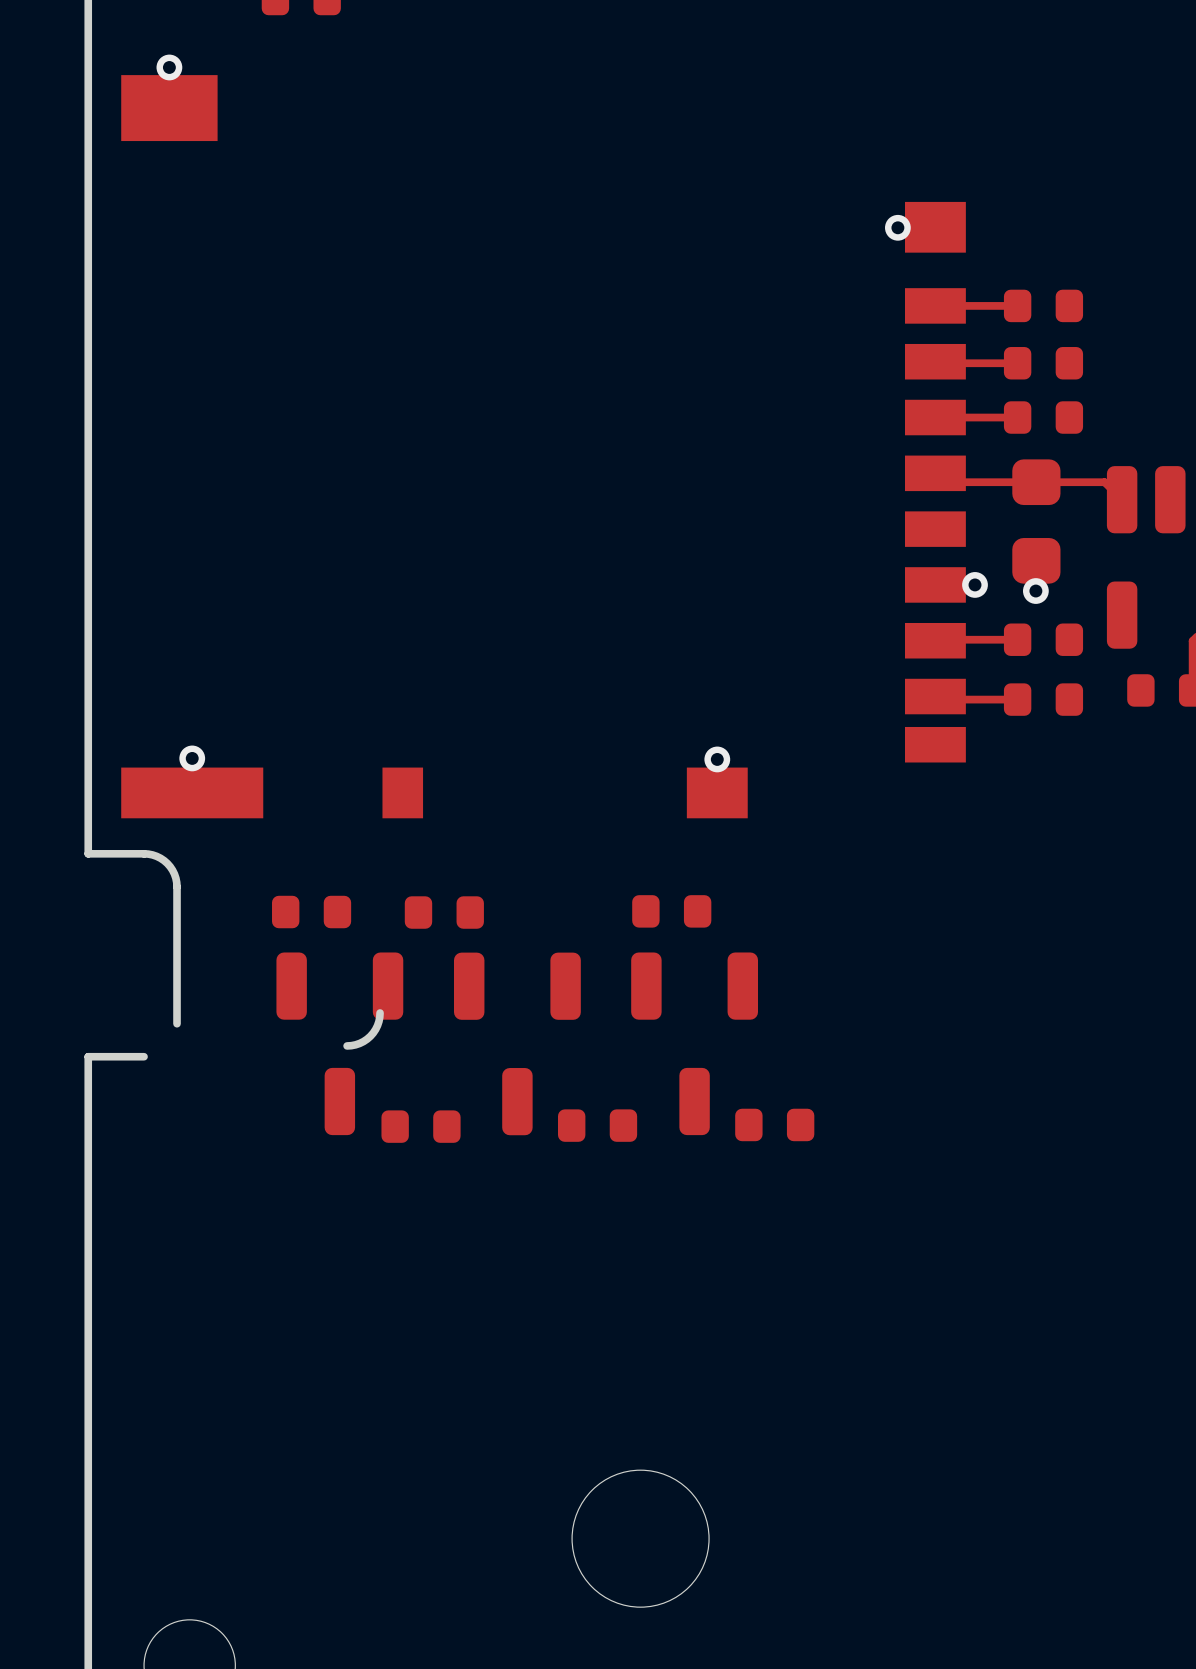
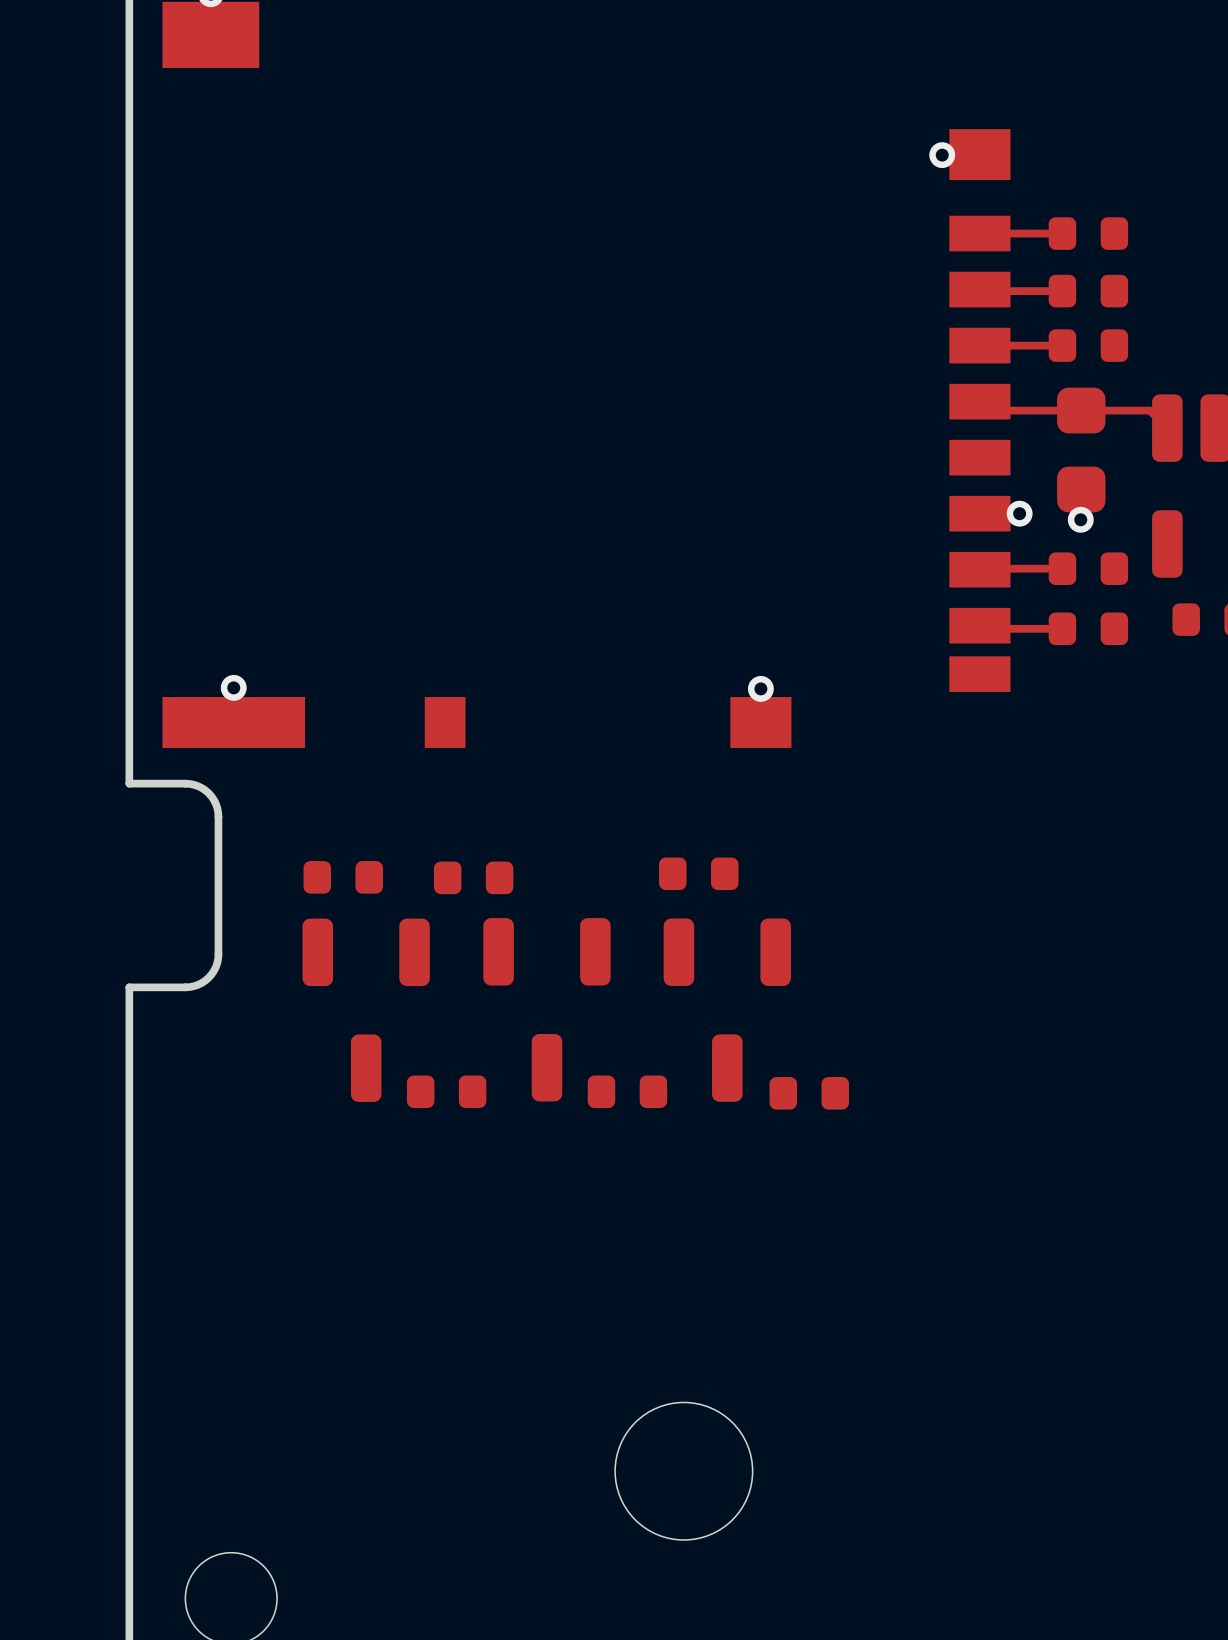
part position: (671, 911) -> (698, 873)
part position: (311, 912) -> (343, 877)
part position: (444, 912) -> (473, 877)
board edge: (380, 1012) (377, 1025) (370, 1036) (359, 1043) (347, 1045) -> (218, 954) (215, 966) (208, 977) (198, 984) (185, 987)
part position: (339, 1043) -> (366, 1010)
part position: (517, 1043) -> (546, 1009)
part position: (694, 1043) -> (727, 1010)
part position: (774, 1124) -> (809, 1093)
part position: (597, 1125) -> (627, 1091)
part position: (421, 1126) -> (446, 1091)

